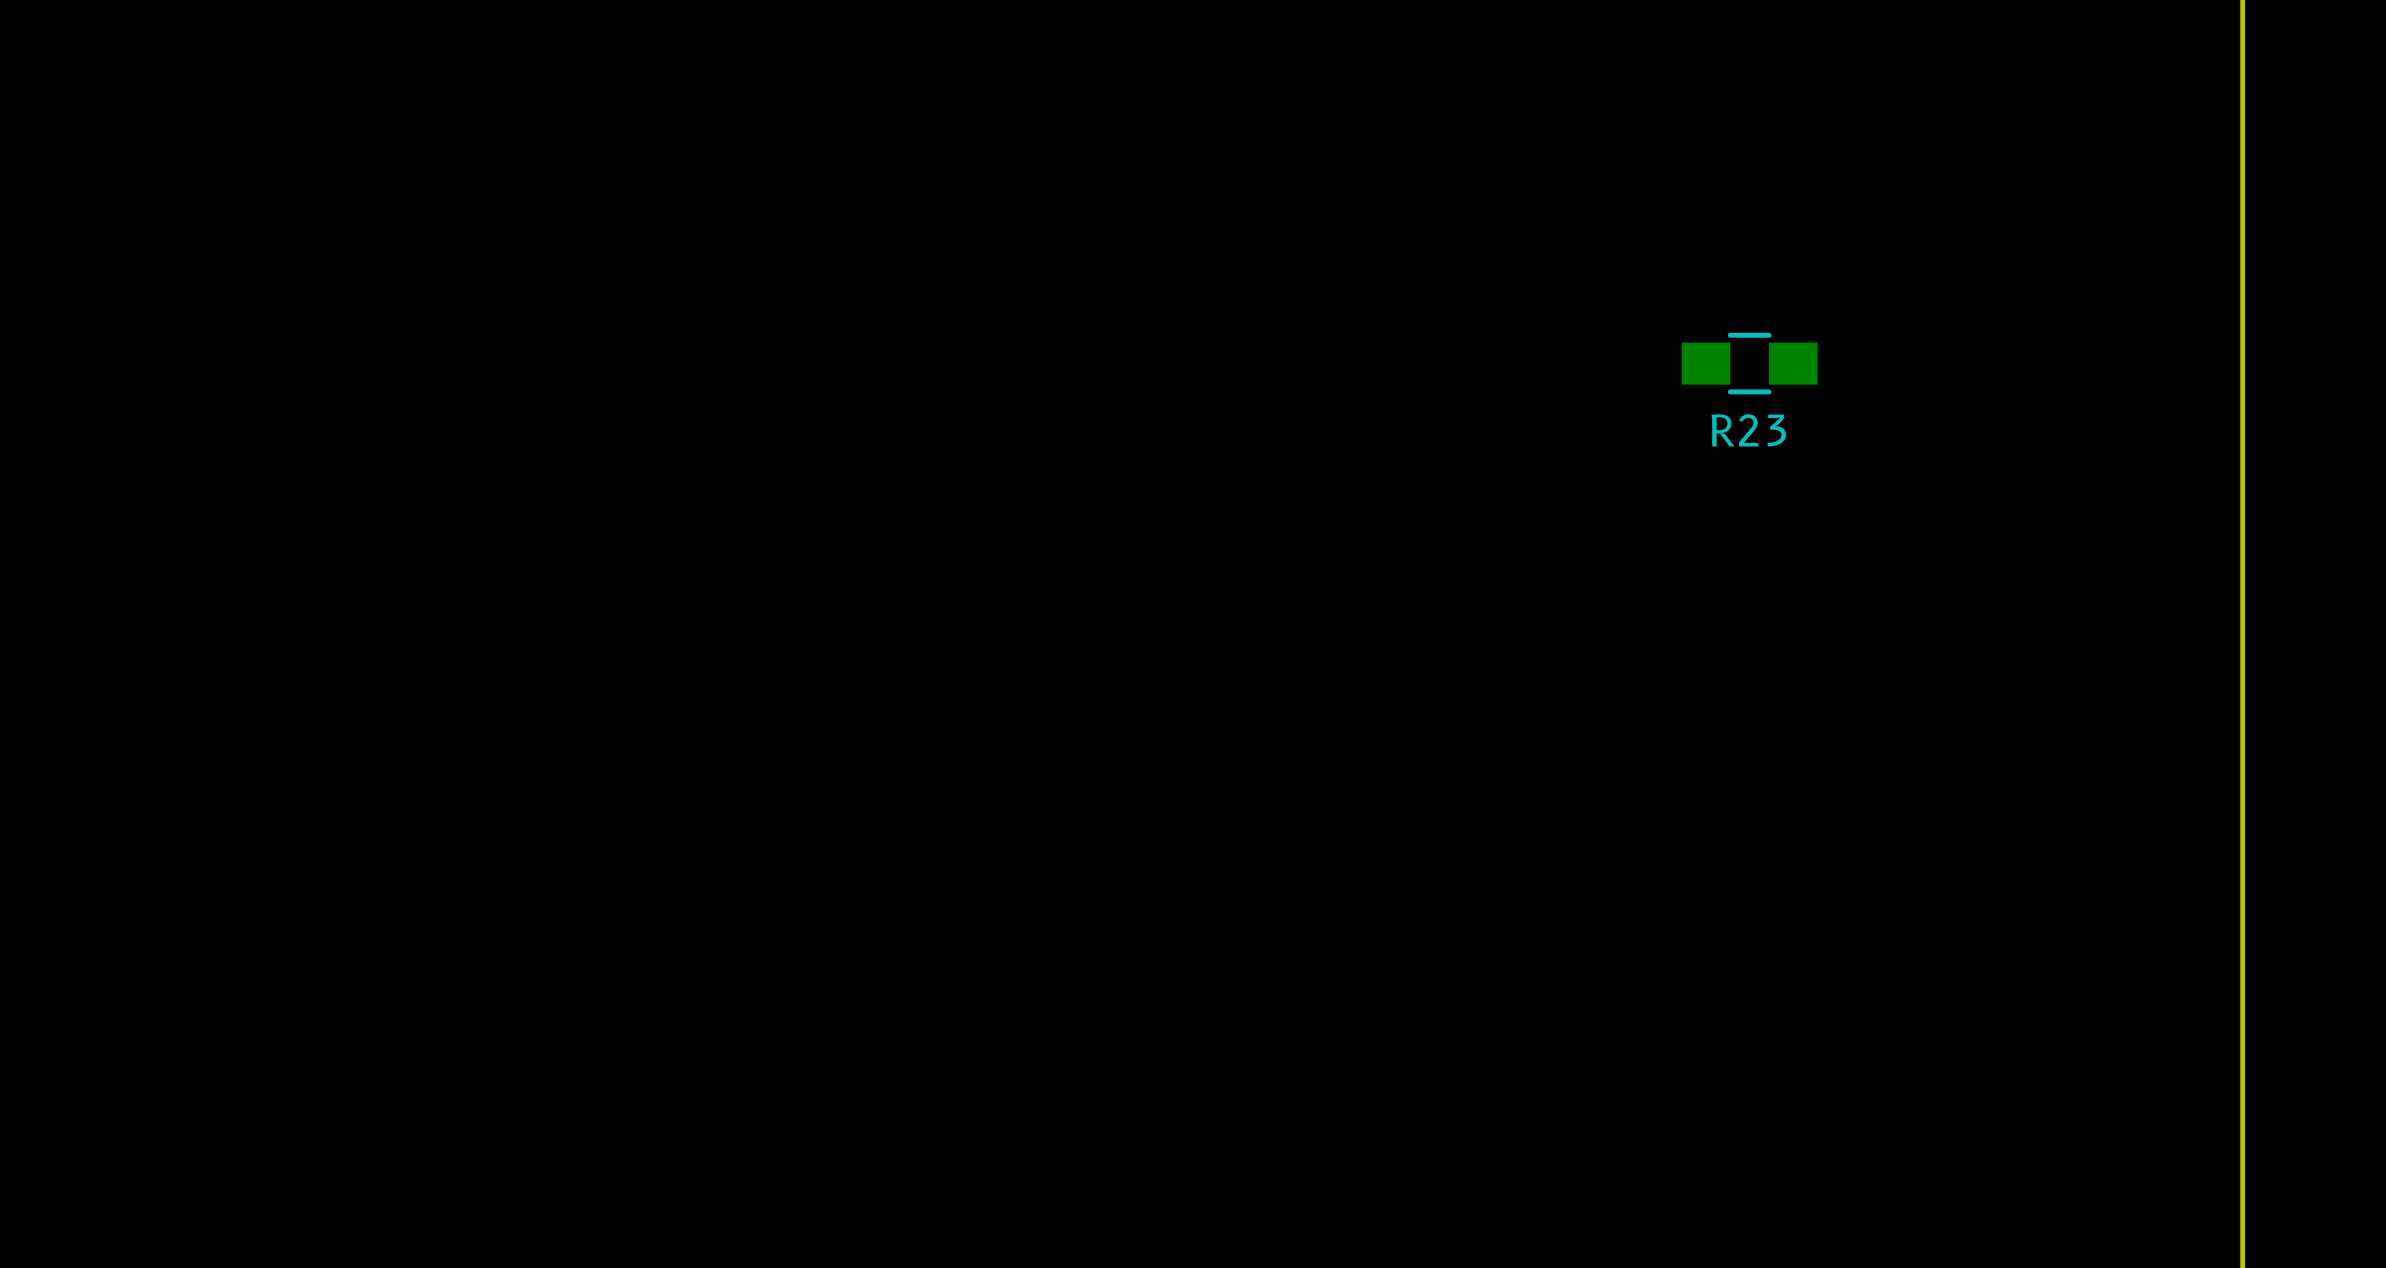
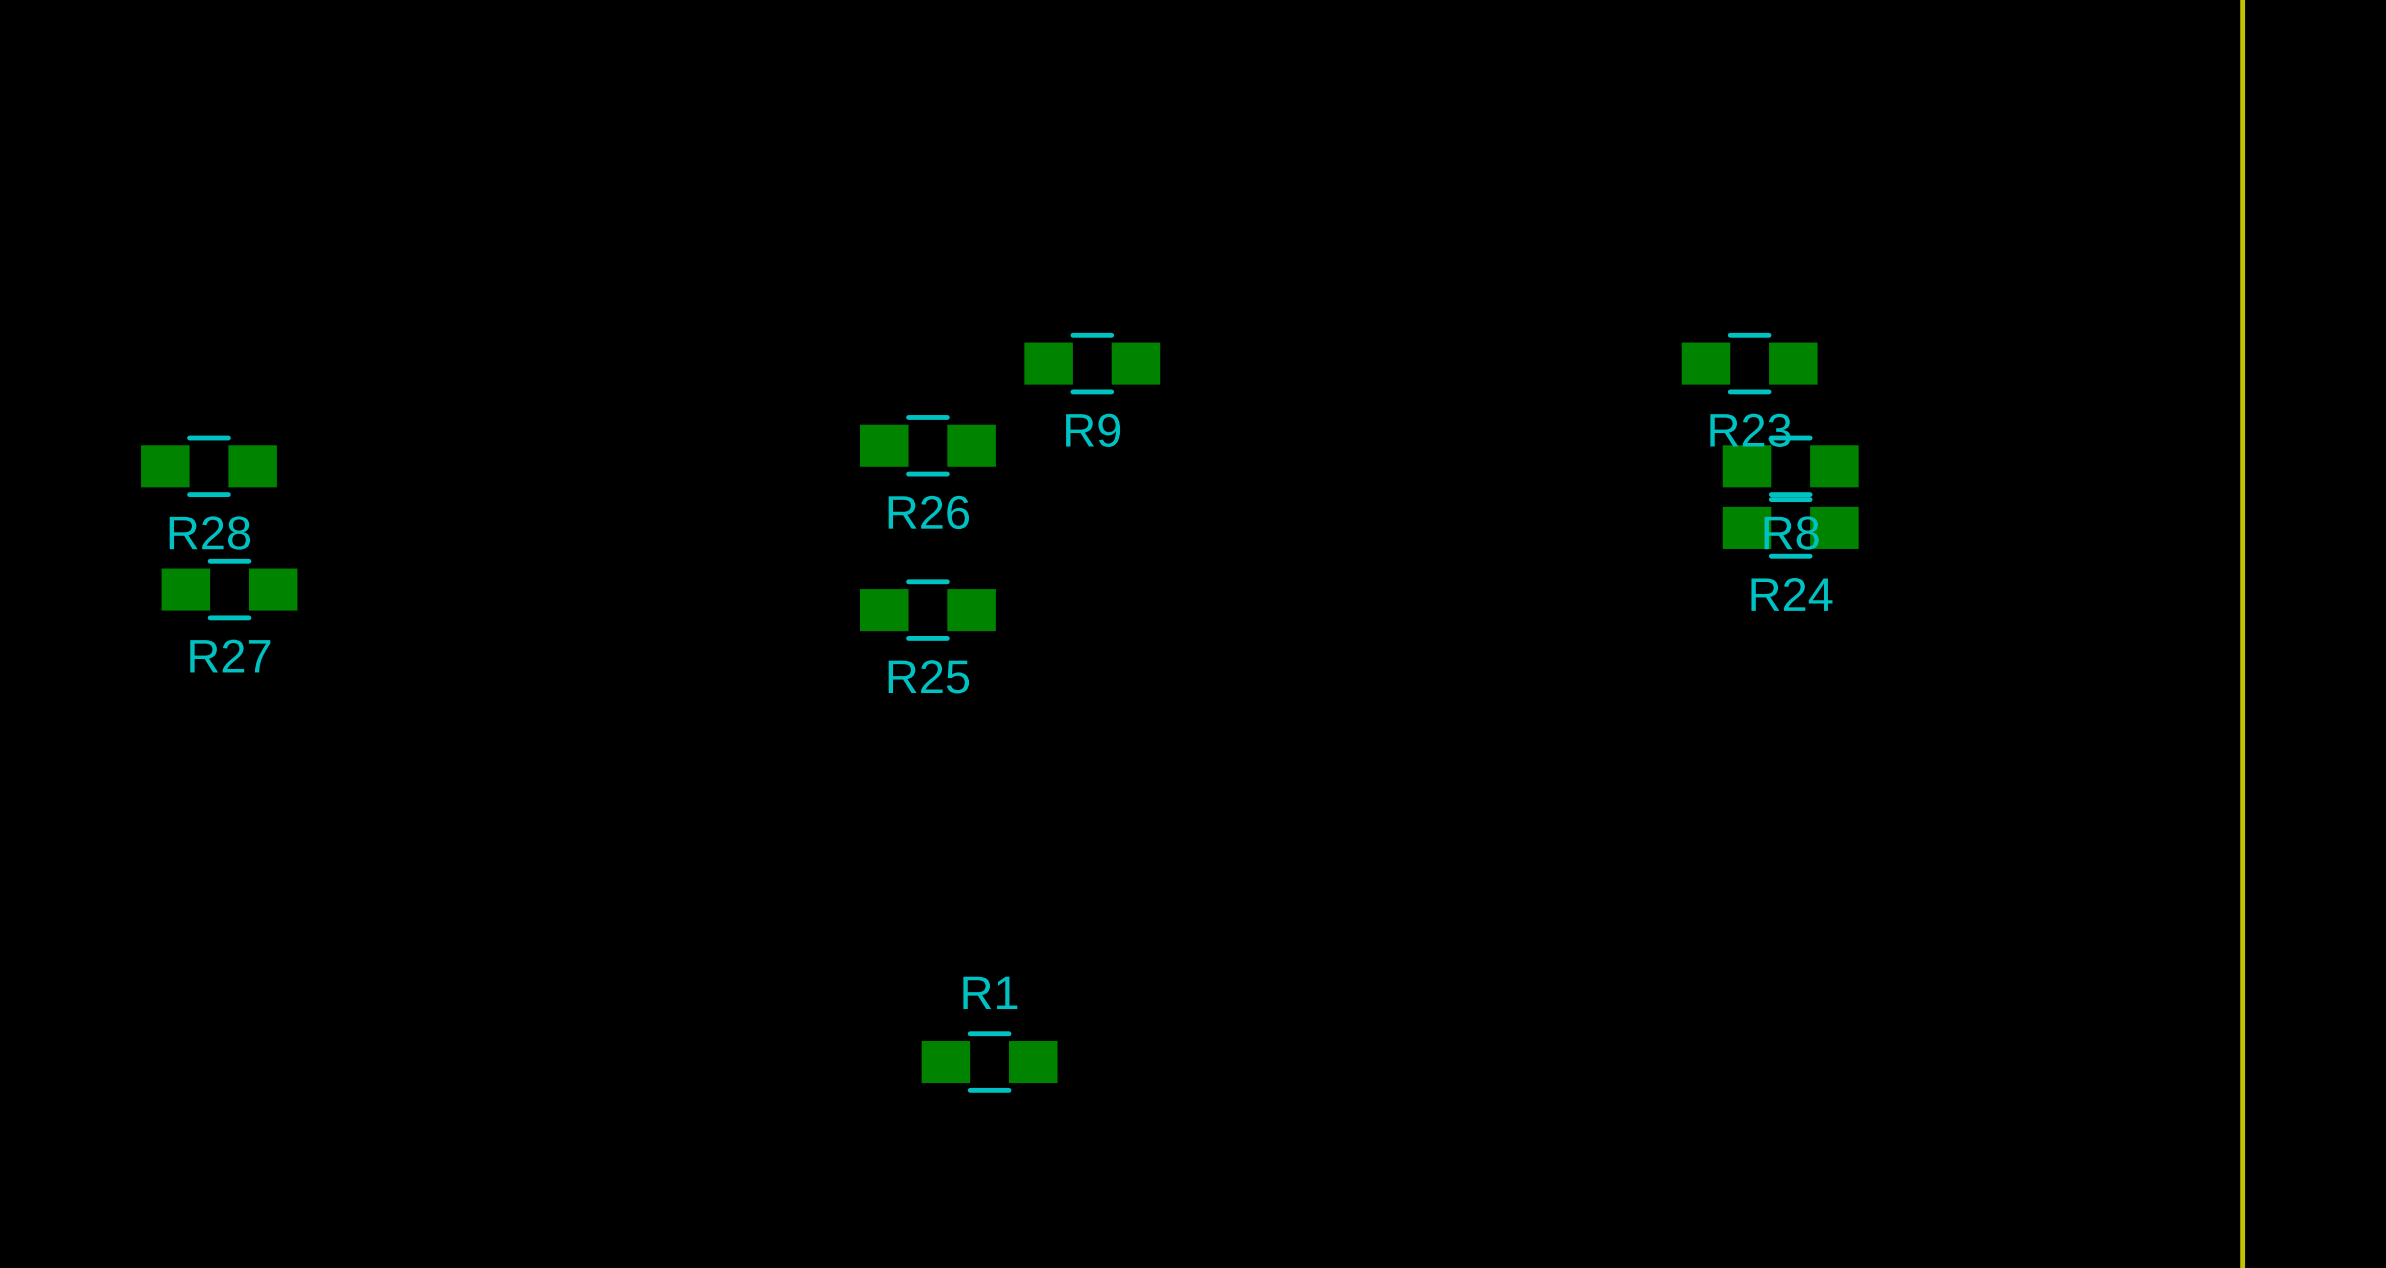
R9: none -> (1092, 363)
R26: none -> (927, 445)
R28: none -> (208, 466)
R8: none -> (1790, 466)
R24: none -> (1790, 527)
R27: none -> (229, 589)
R25: none -> (927, 610)
R1: none -> (989, 1062)

